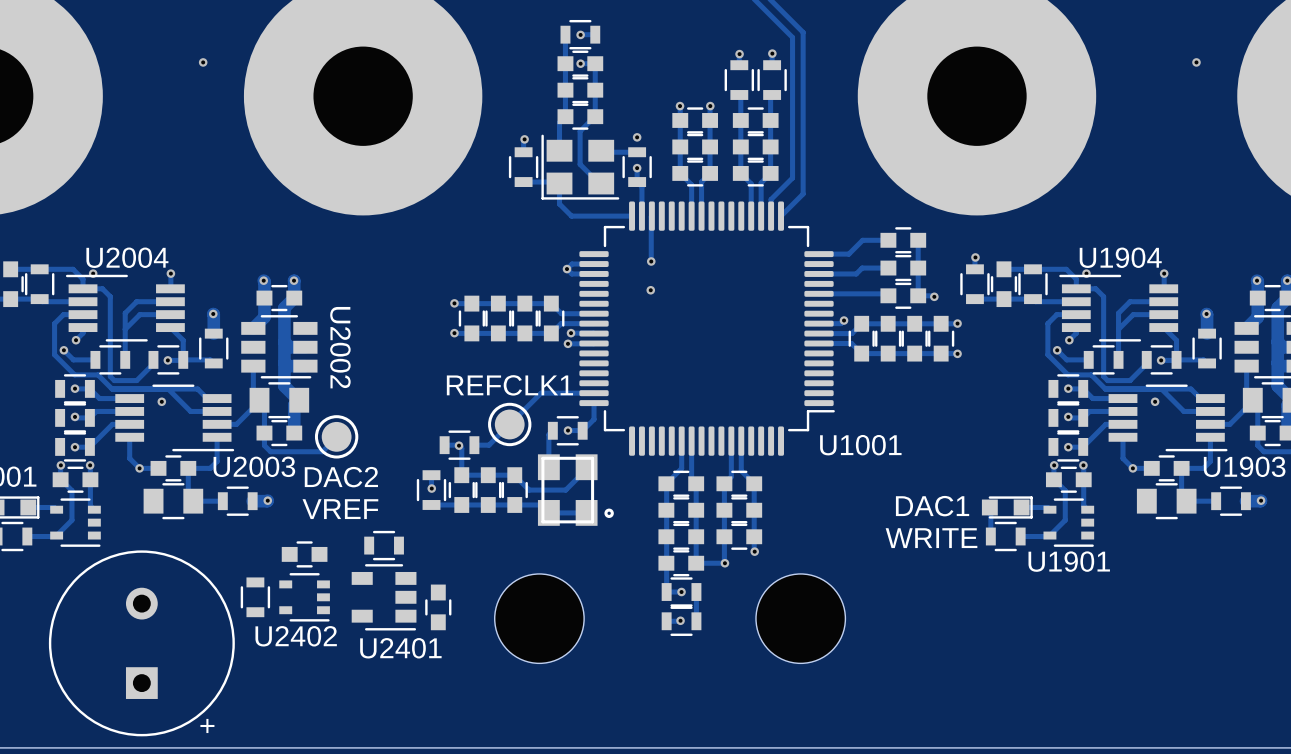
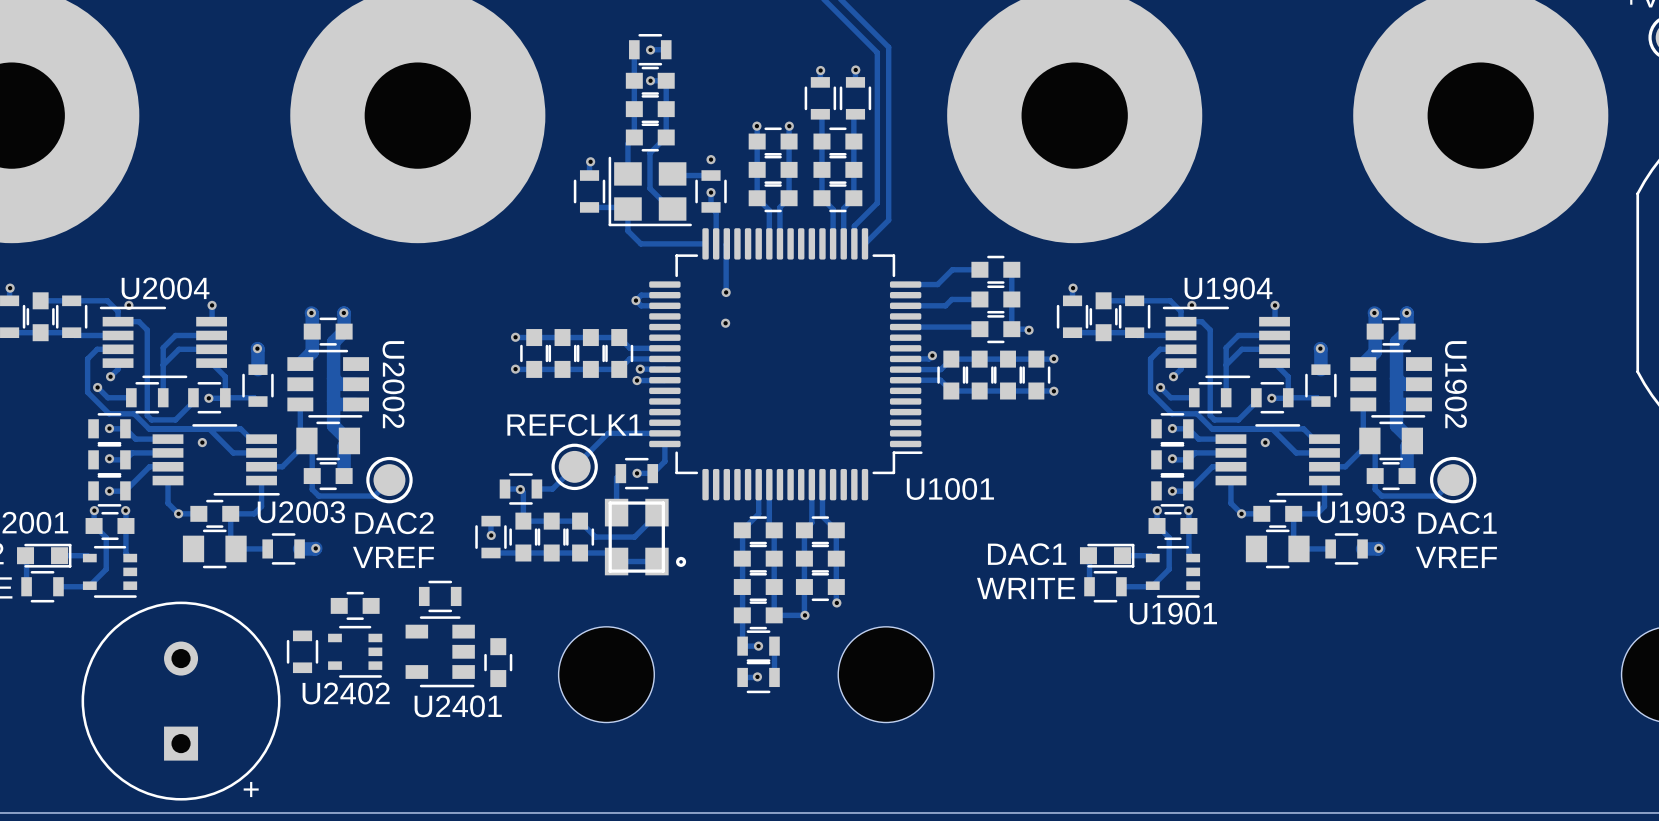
via: (203, 62) -> none
via: (1196, 62) -> none

